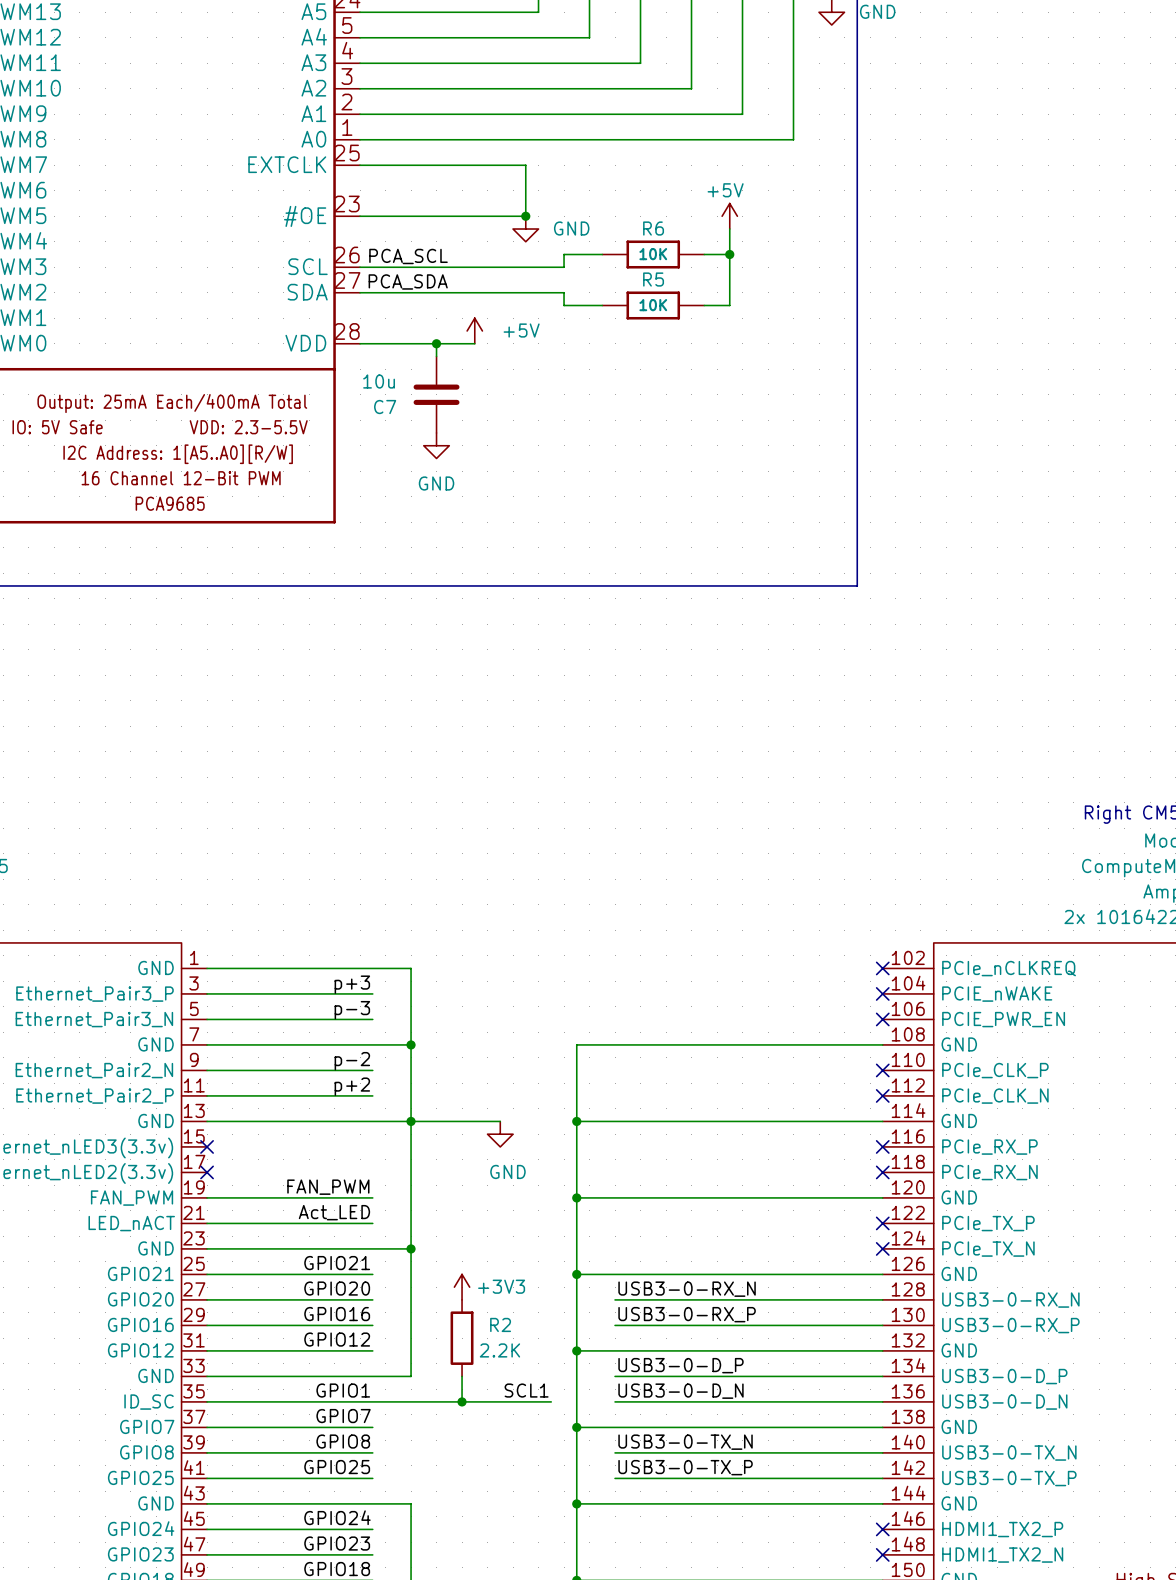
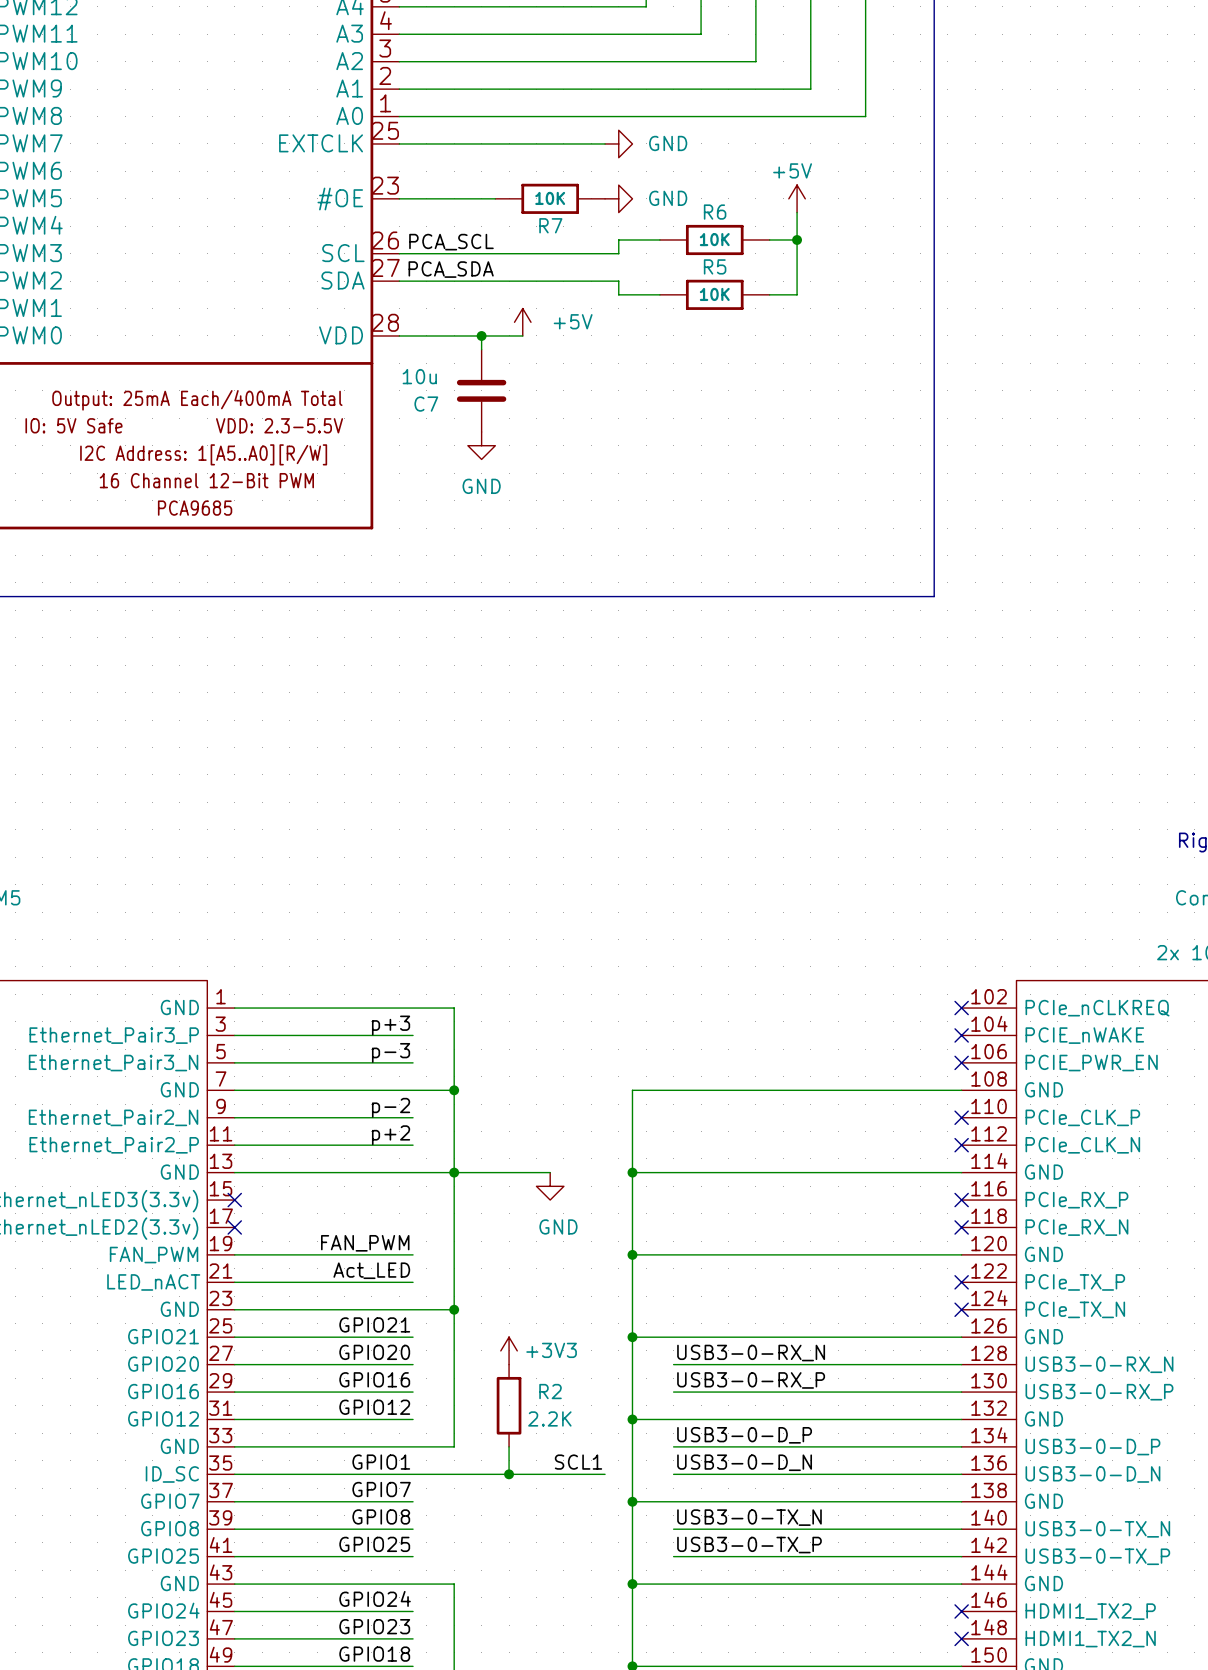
wire: (525, 165) (525, 216) (449, 216) -> (577, 143) (605, 143)
power symbol: none -> GND (618, 143)
R7: none -> 10K (550, 198)
junction: (525, 216) -> none
power symbol: none -> GND (618, 198)
power symbol: GND (525, 229) -> none

